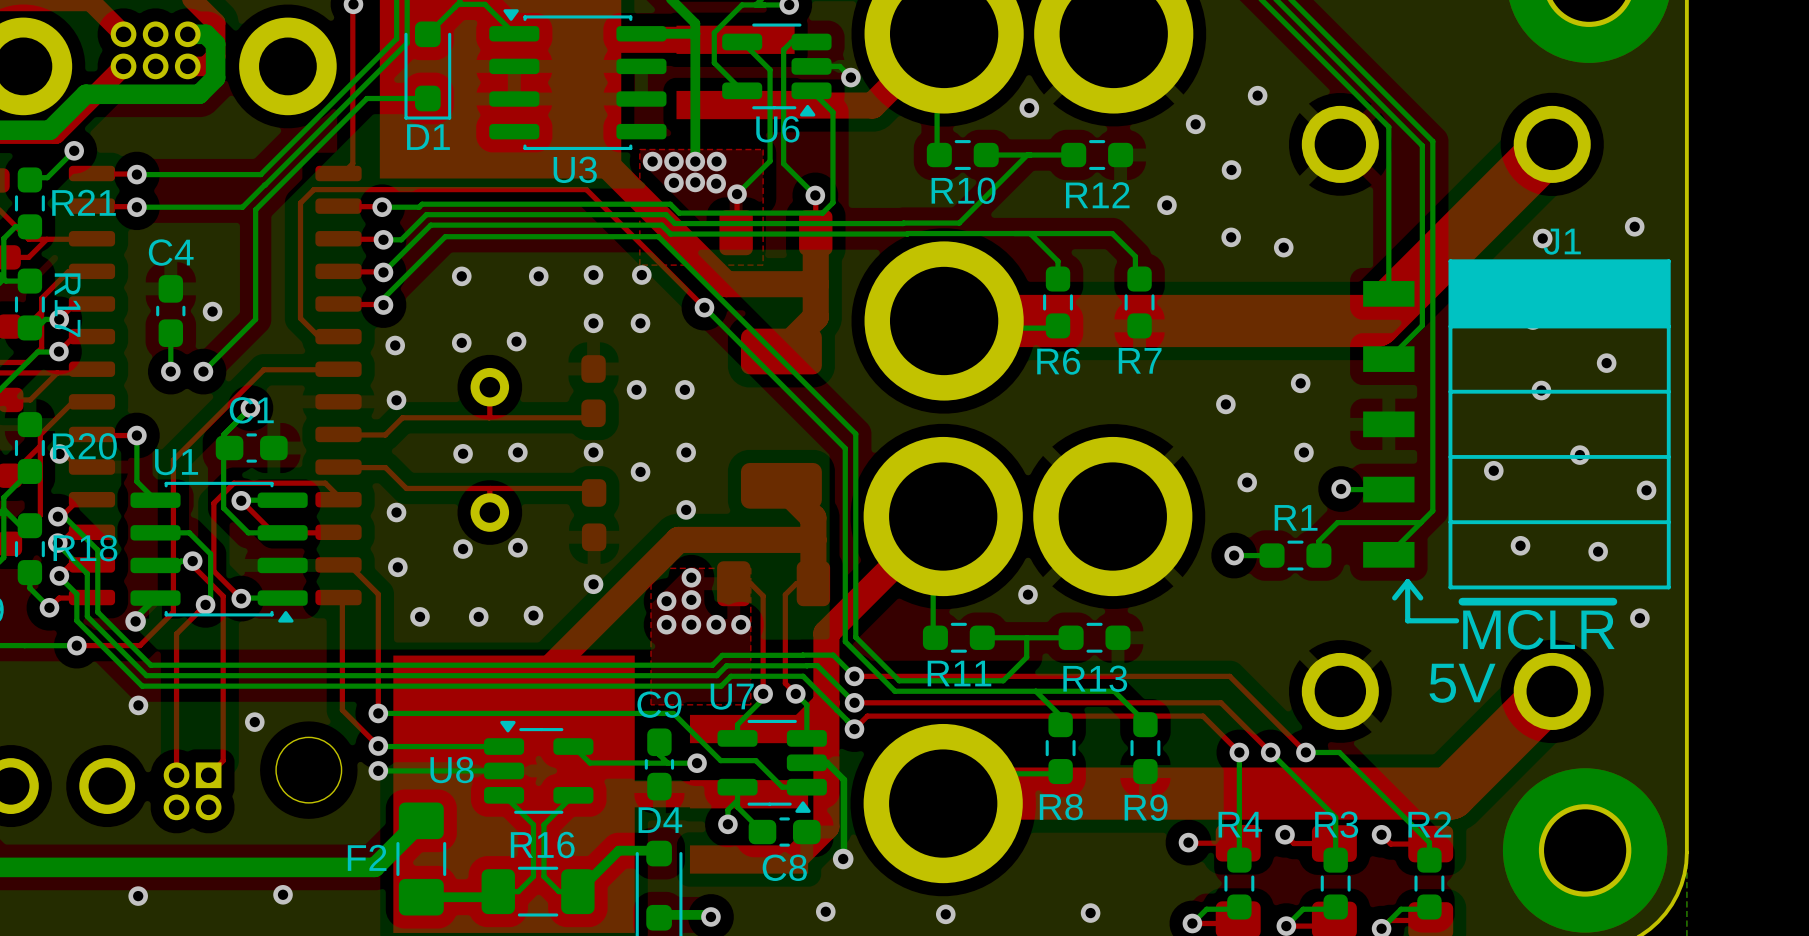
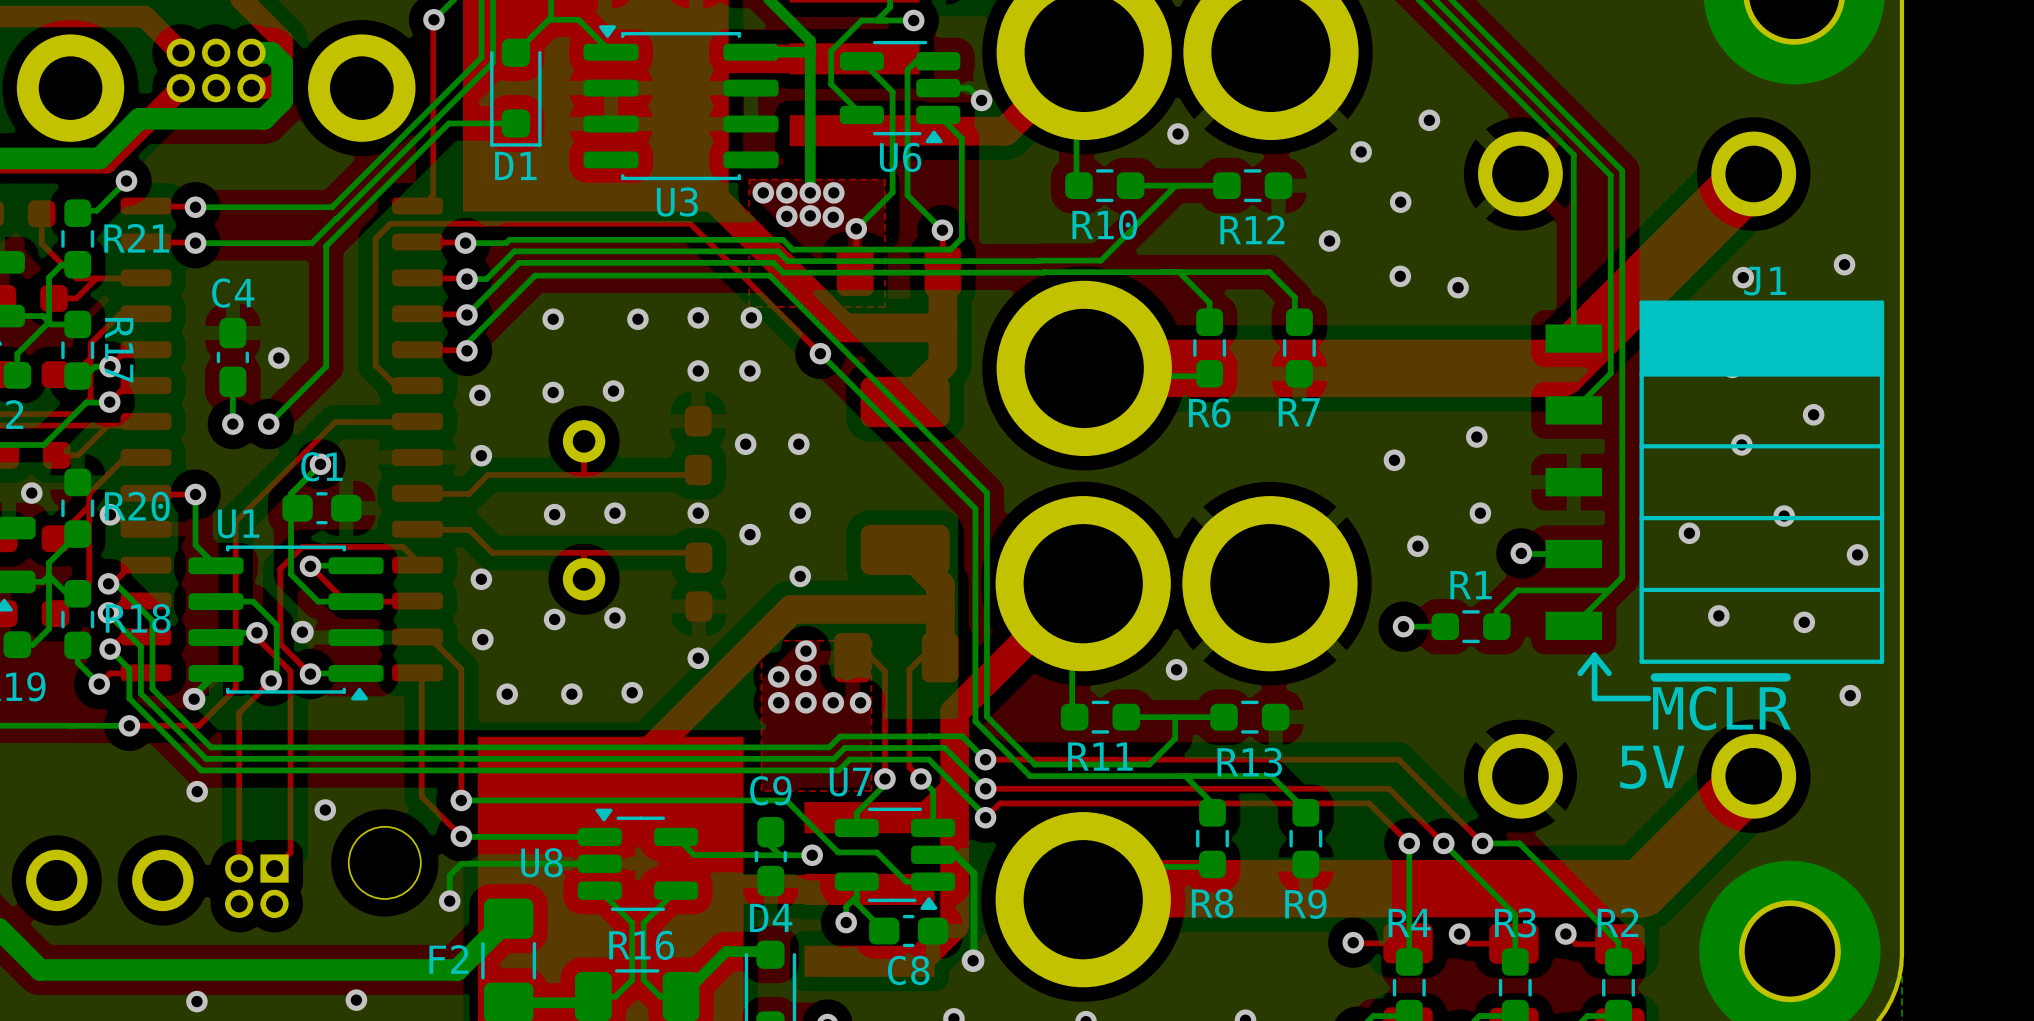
via: none -> (302, 632)
bottom track: none -> (461, 863) (449, 875) (449, 901)
via position: (378, 770) -> (449, 901)

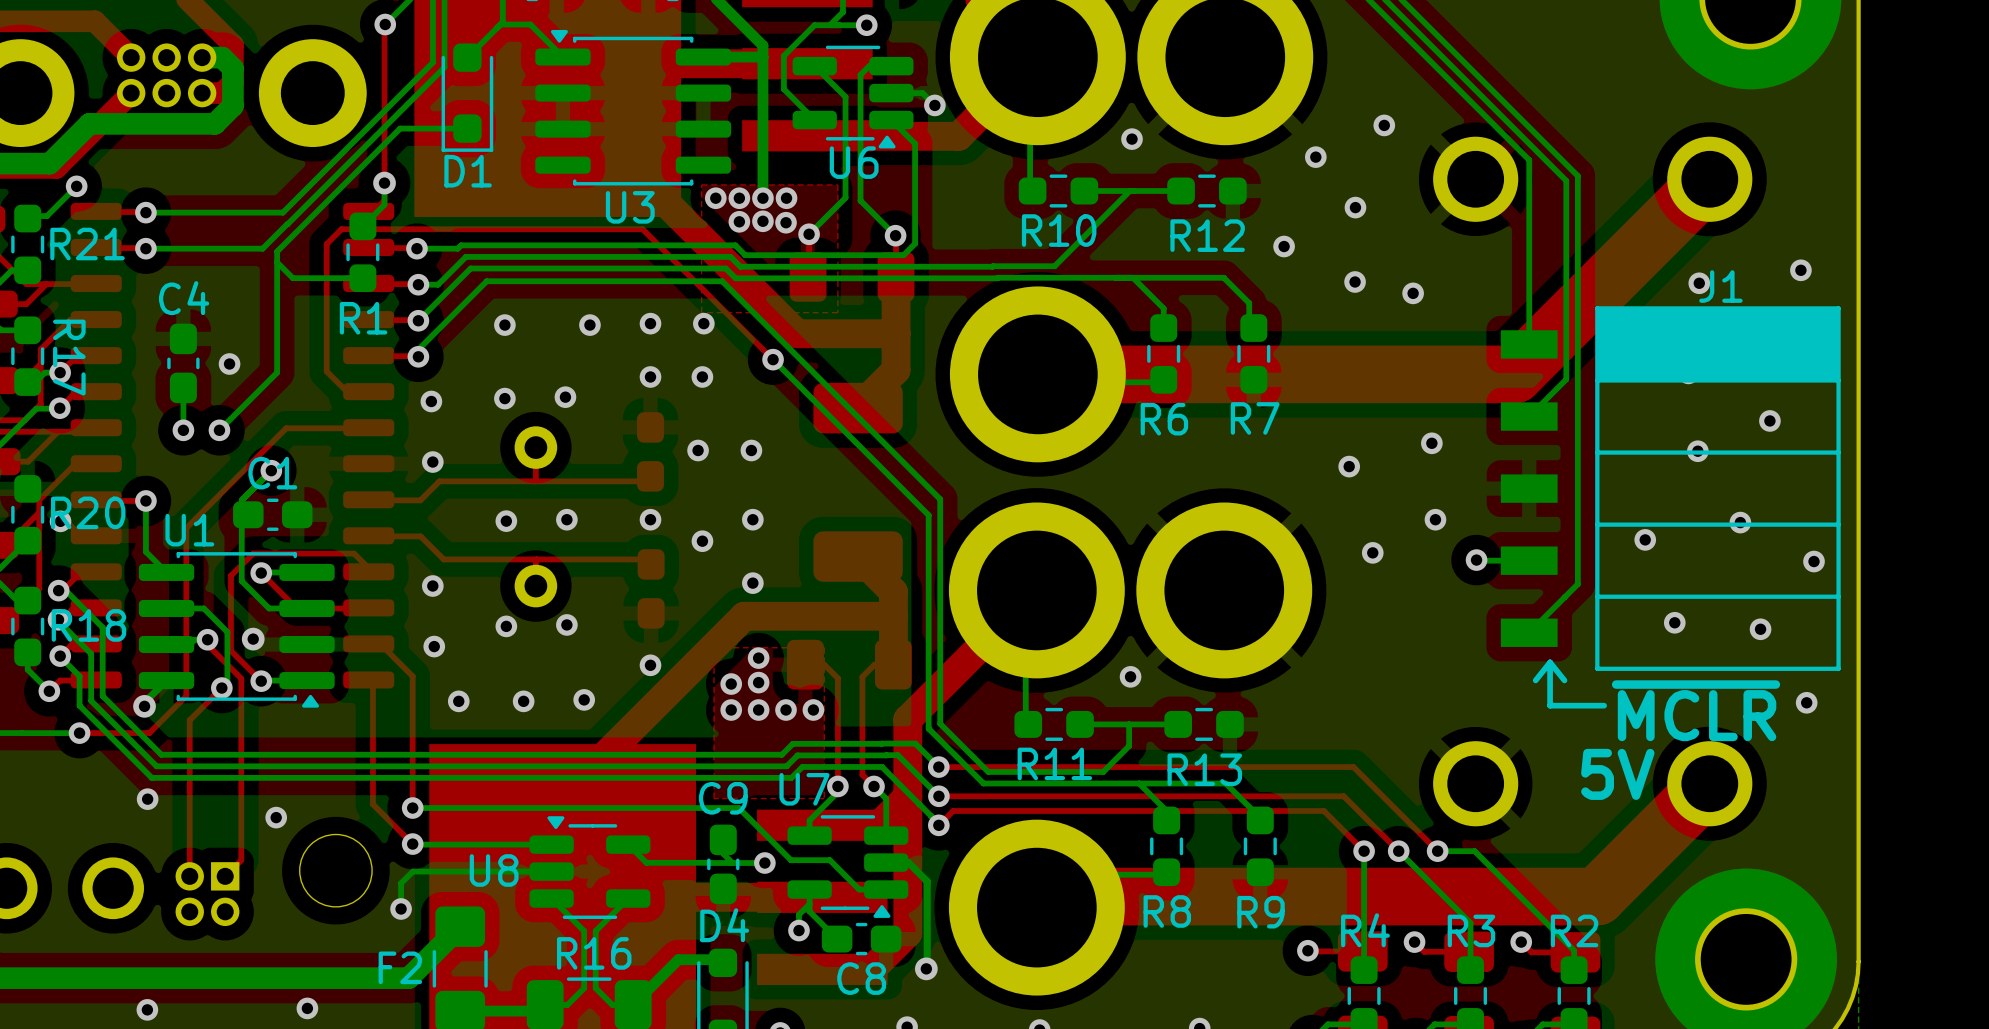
bottom track: none -> (384, 183) (384, 204) (362, 226)
via: none -> (384, 183)
bottom track: none -> (277, 262) (292, 278) (362, 278)
R1 name position: R1 (1471, 585) -> R1 (363, 318)
bottom track: (1609, 590) (1517, 590) (1496, 610) (1496, 626) -> none
via: (1403, 626) -> none
bottom track: (1442, 626) (1403, 626) -> none
R1 rotation: 0° (1471, 626) -> 90° clockwise (362, 252)
R1 position: (1471, 626) -> (362, 252)

